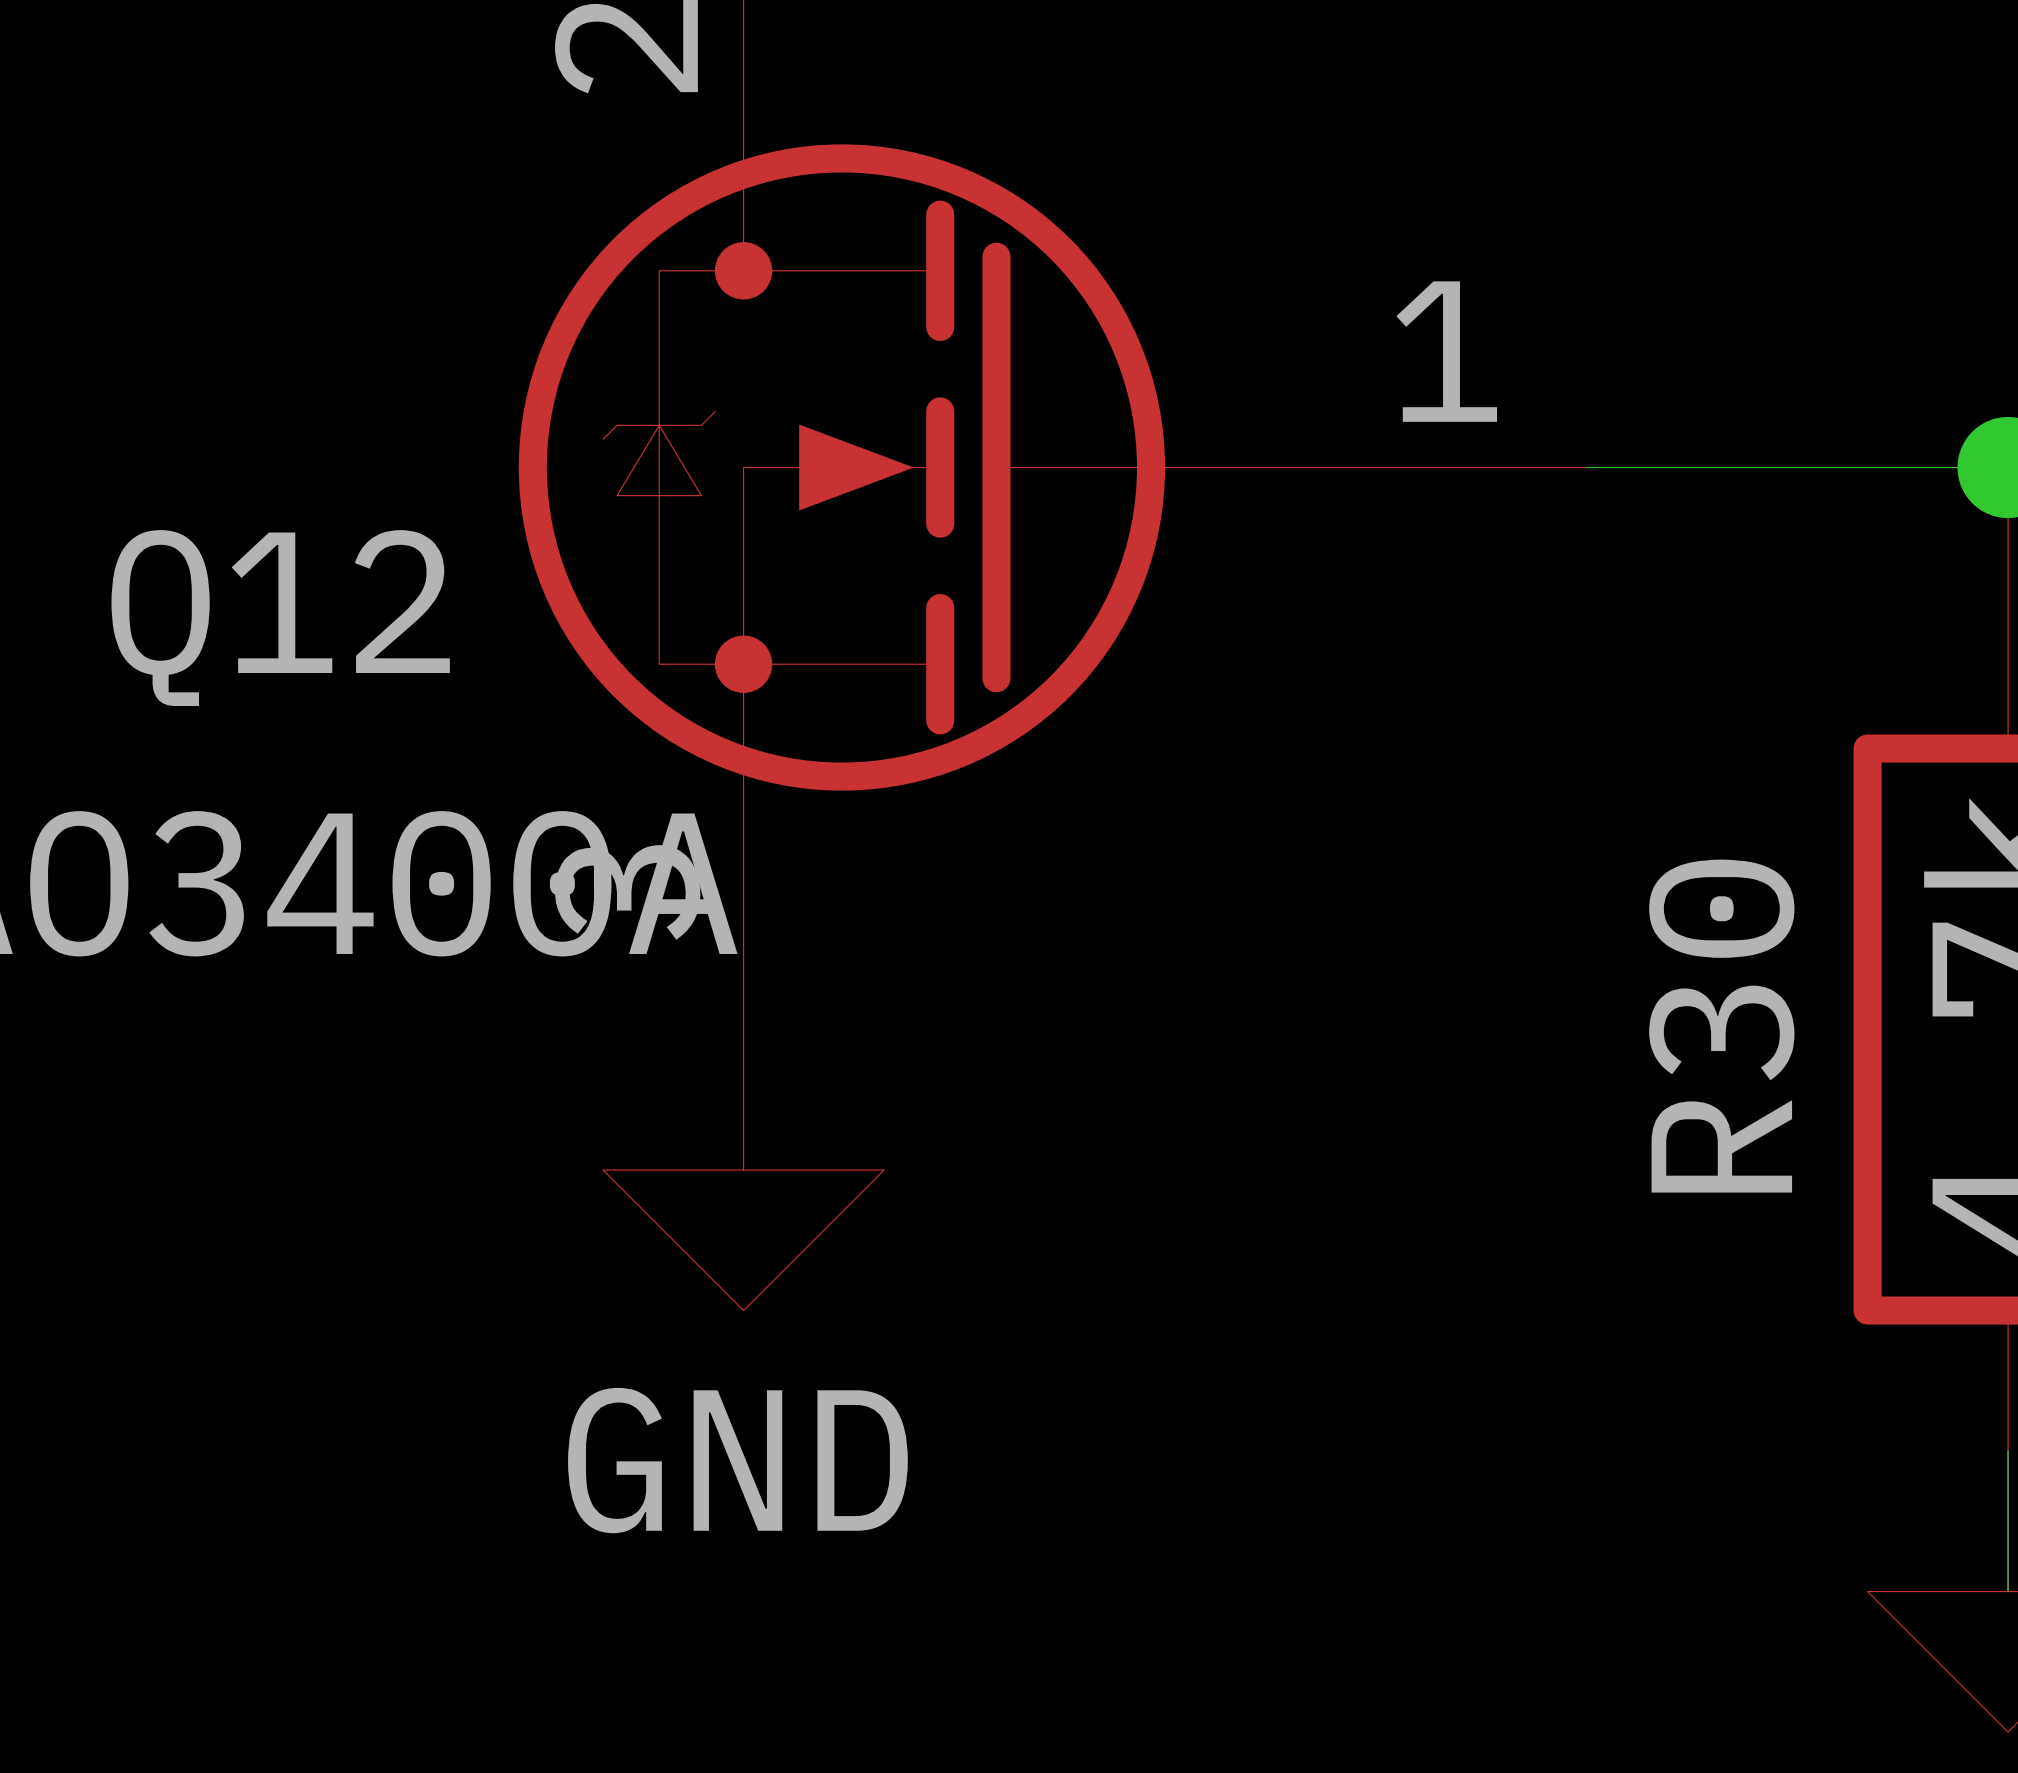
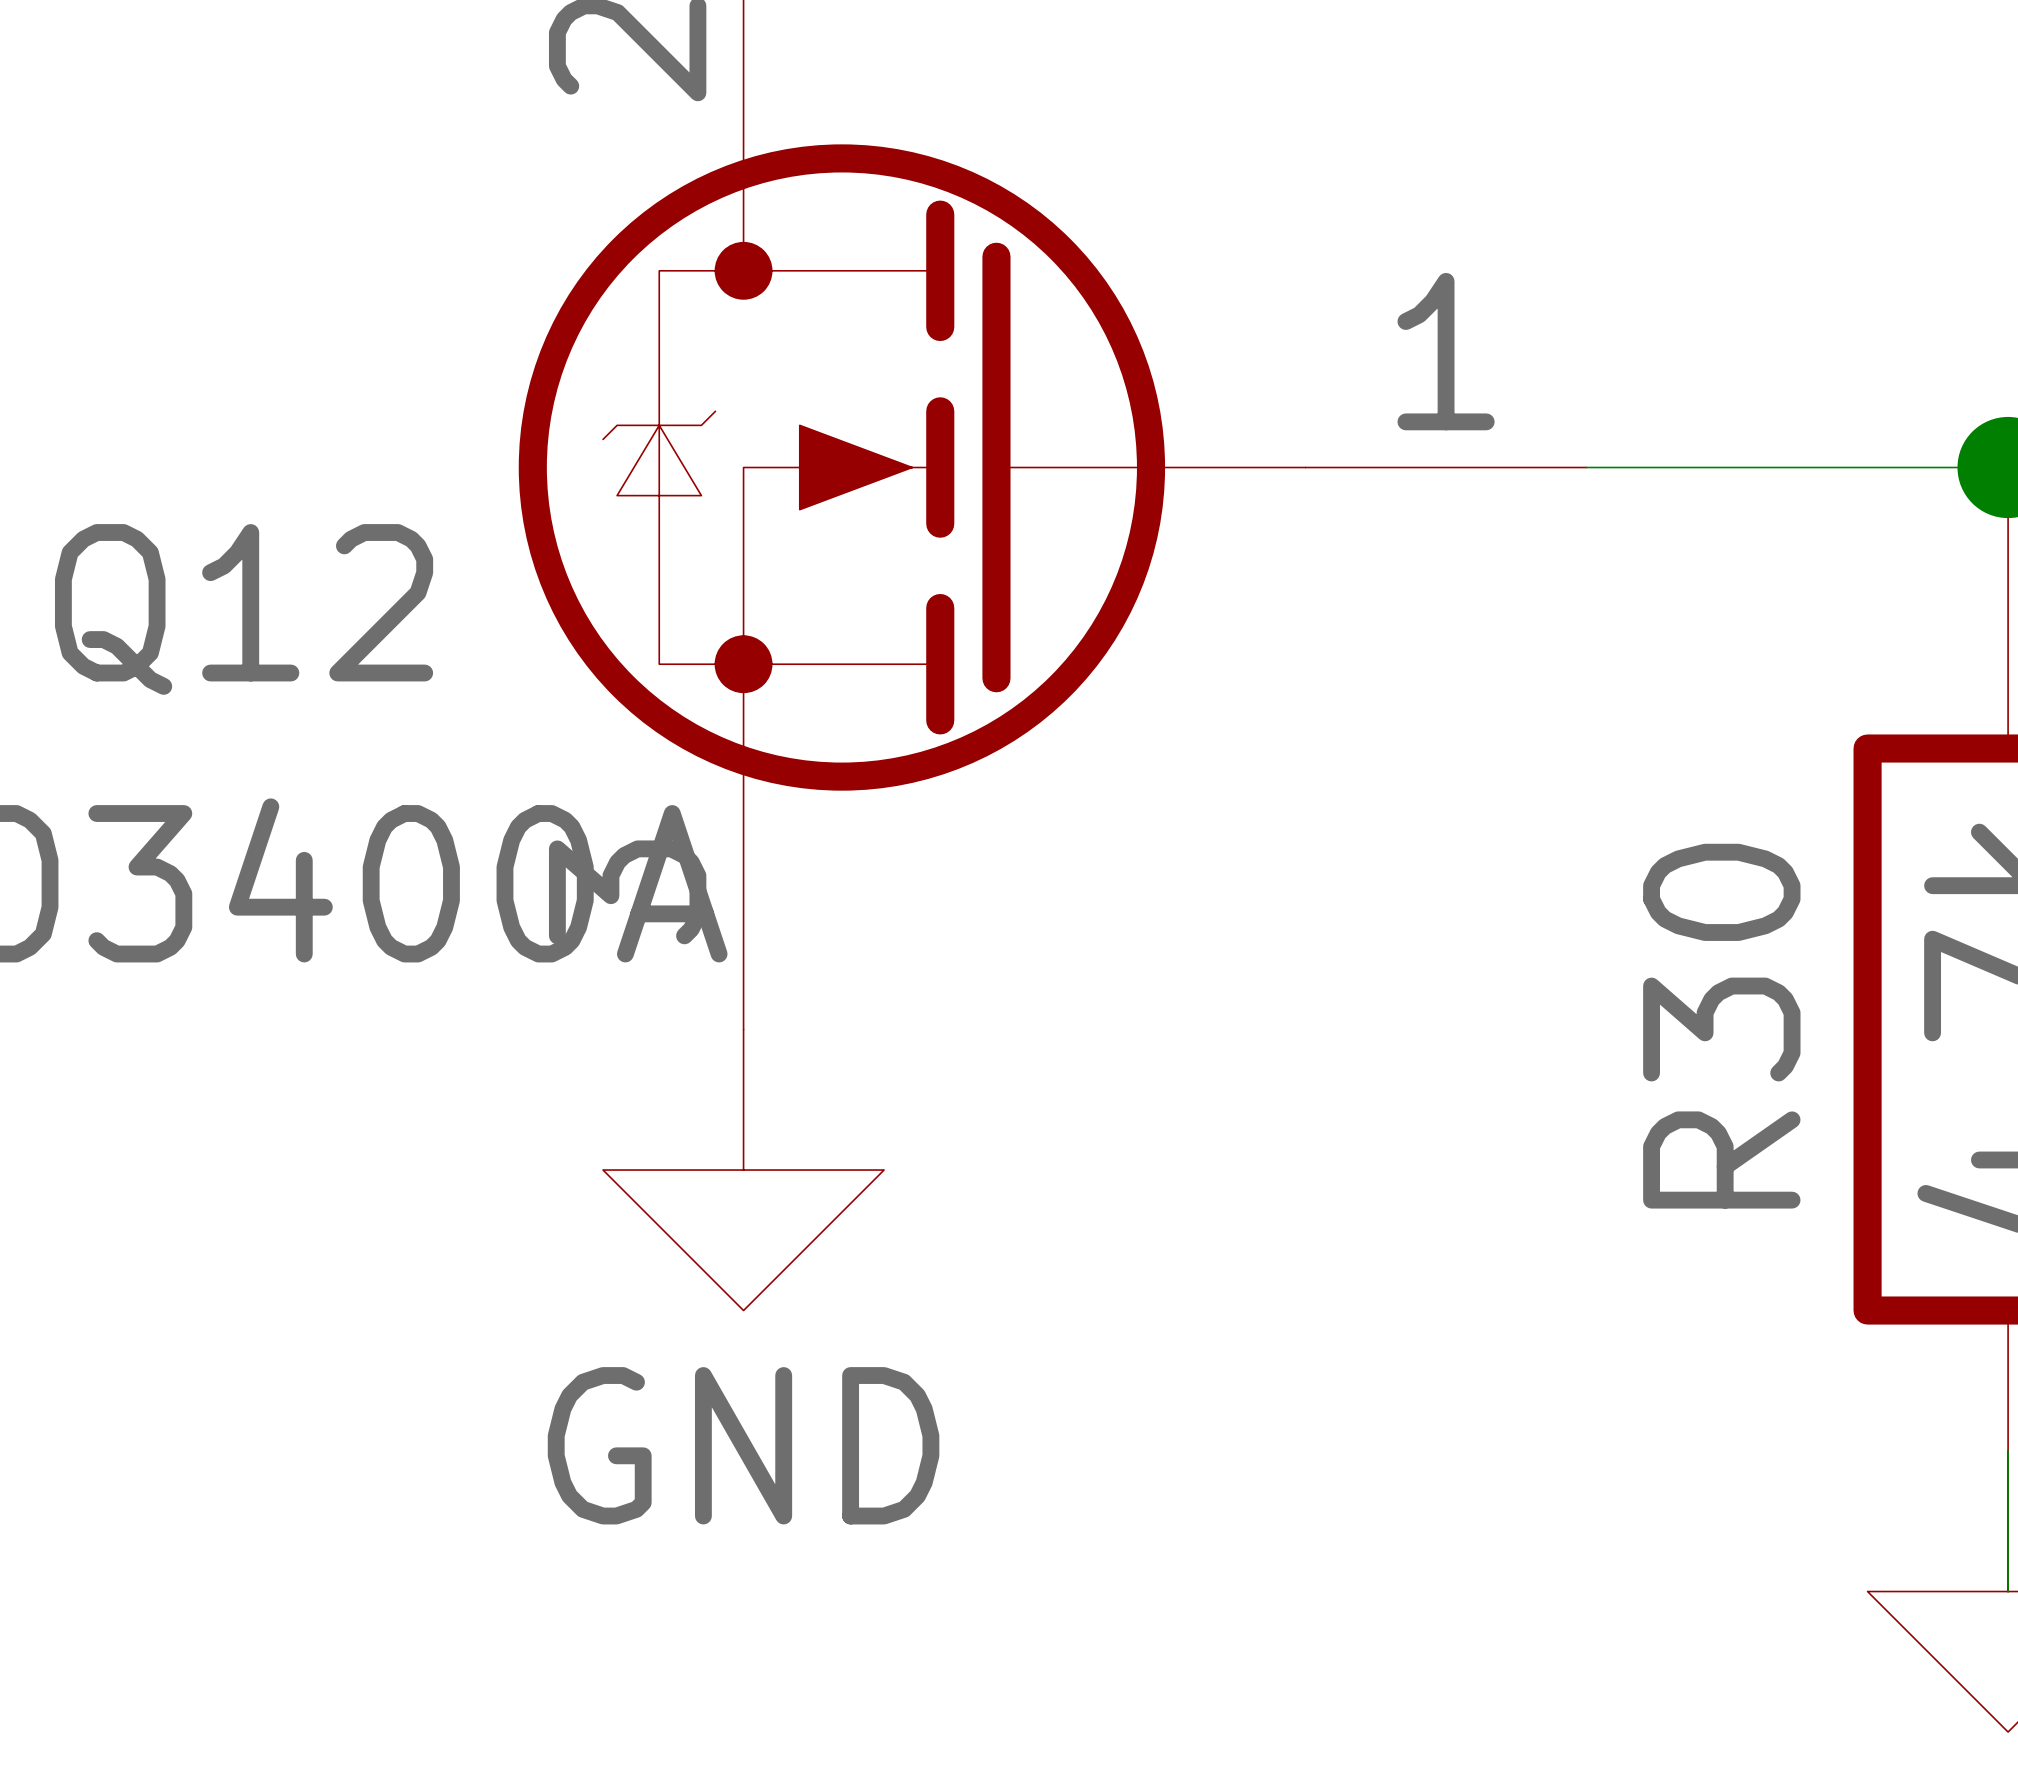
power symbol text position: GND (737, 1460) -> GND (743, 1445)

